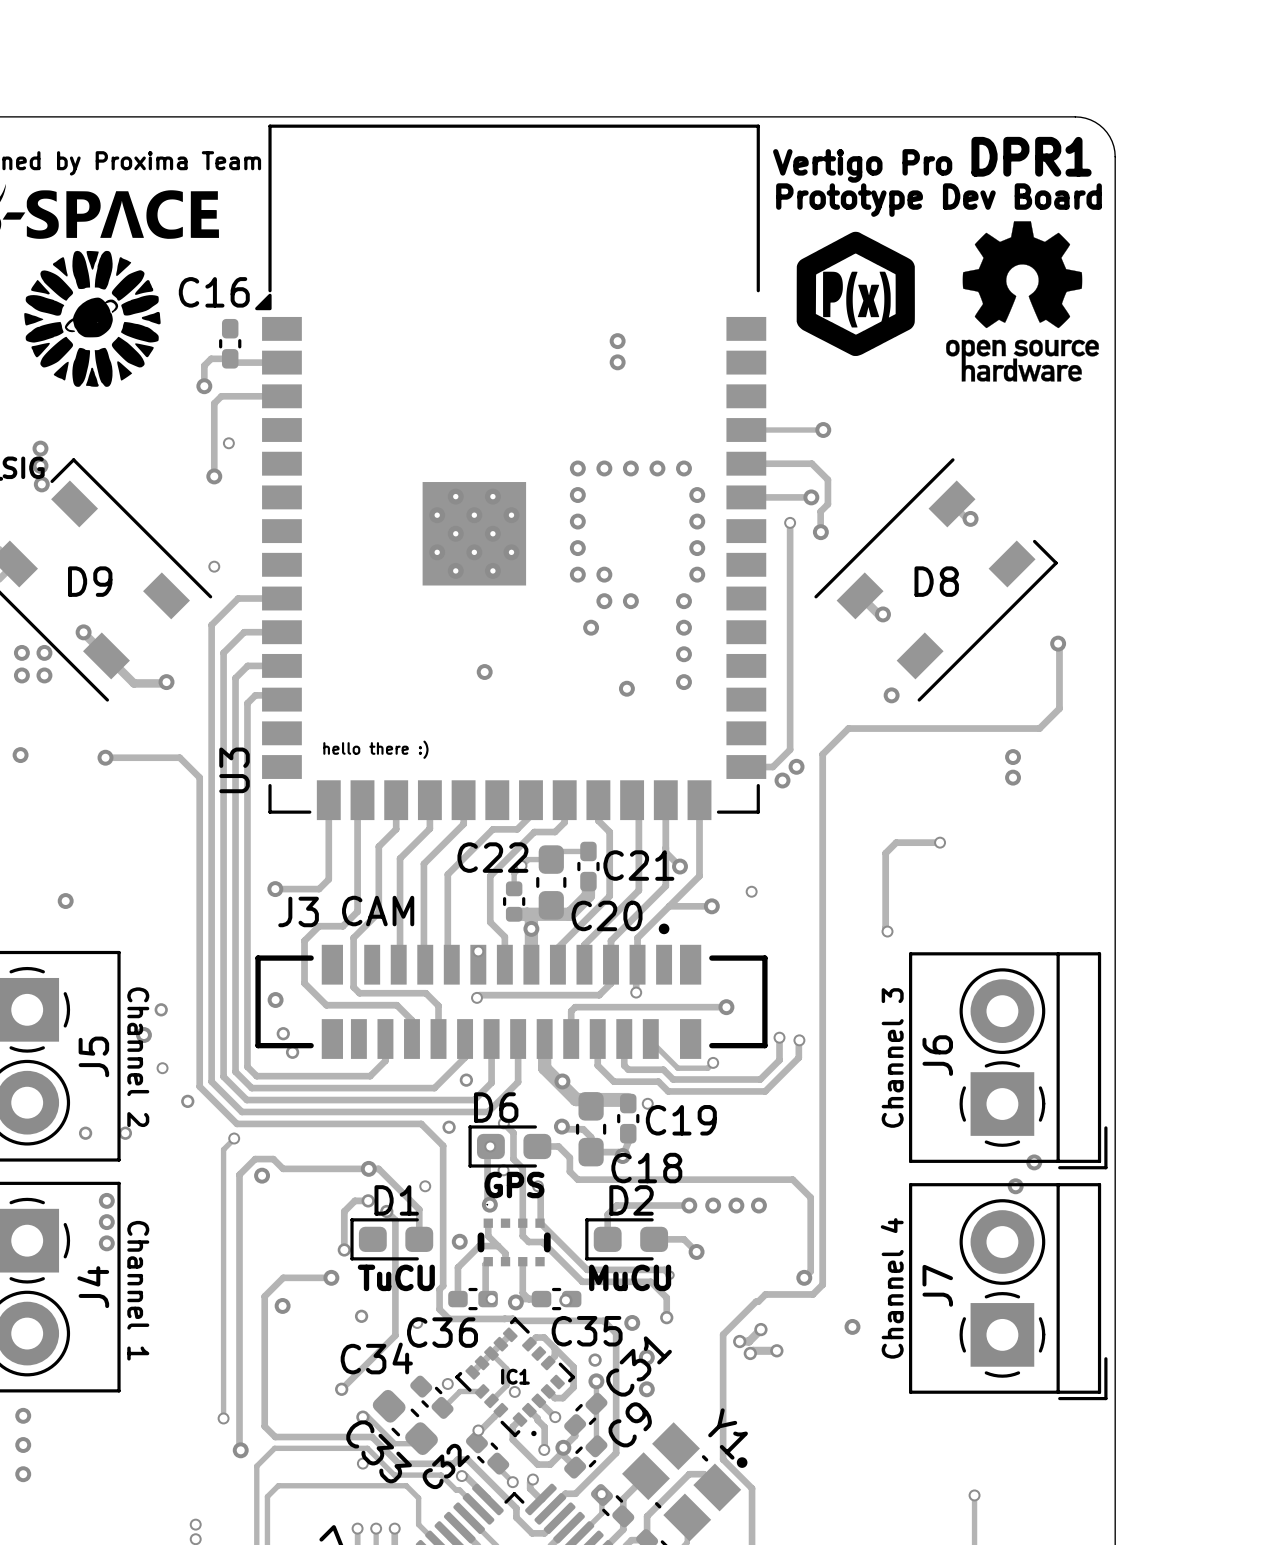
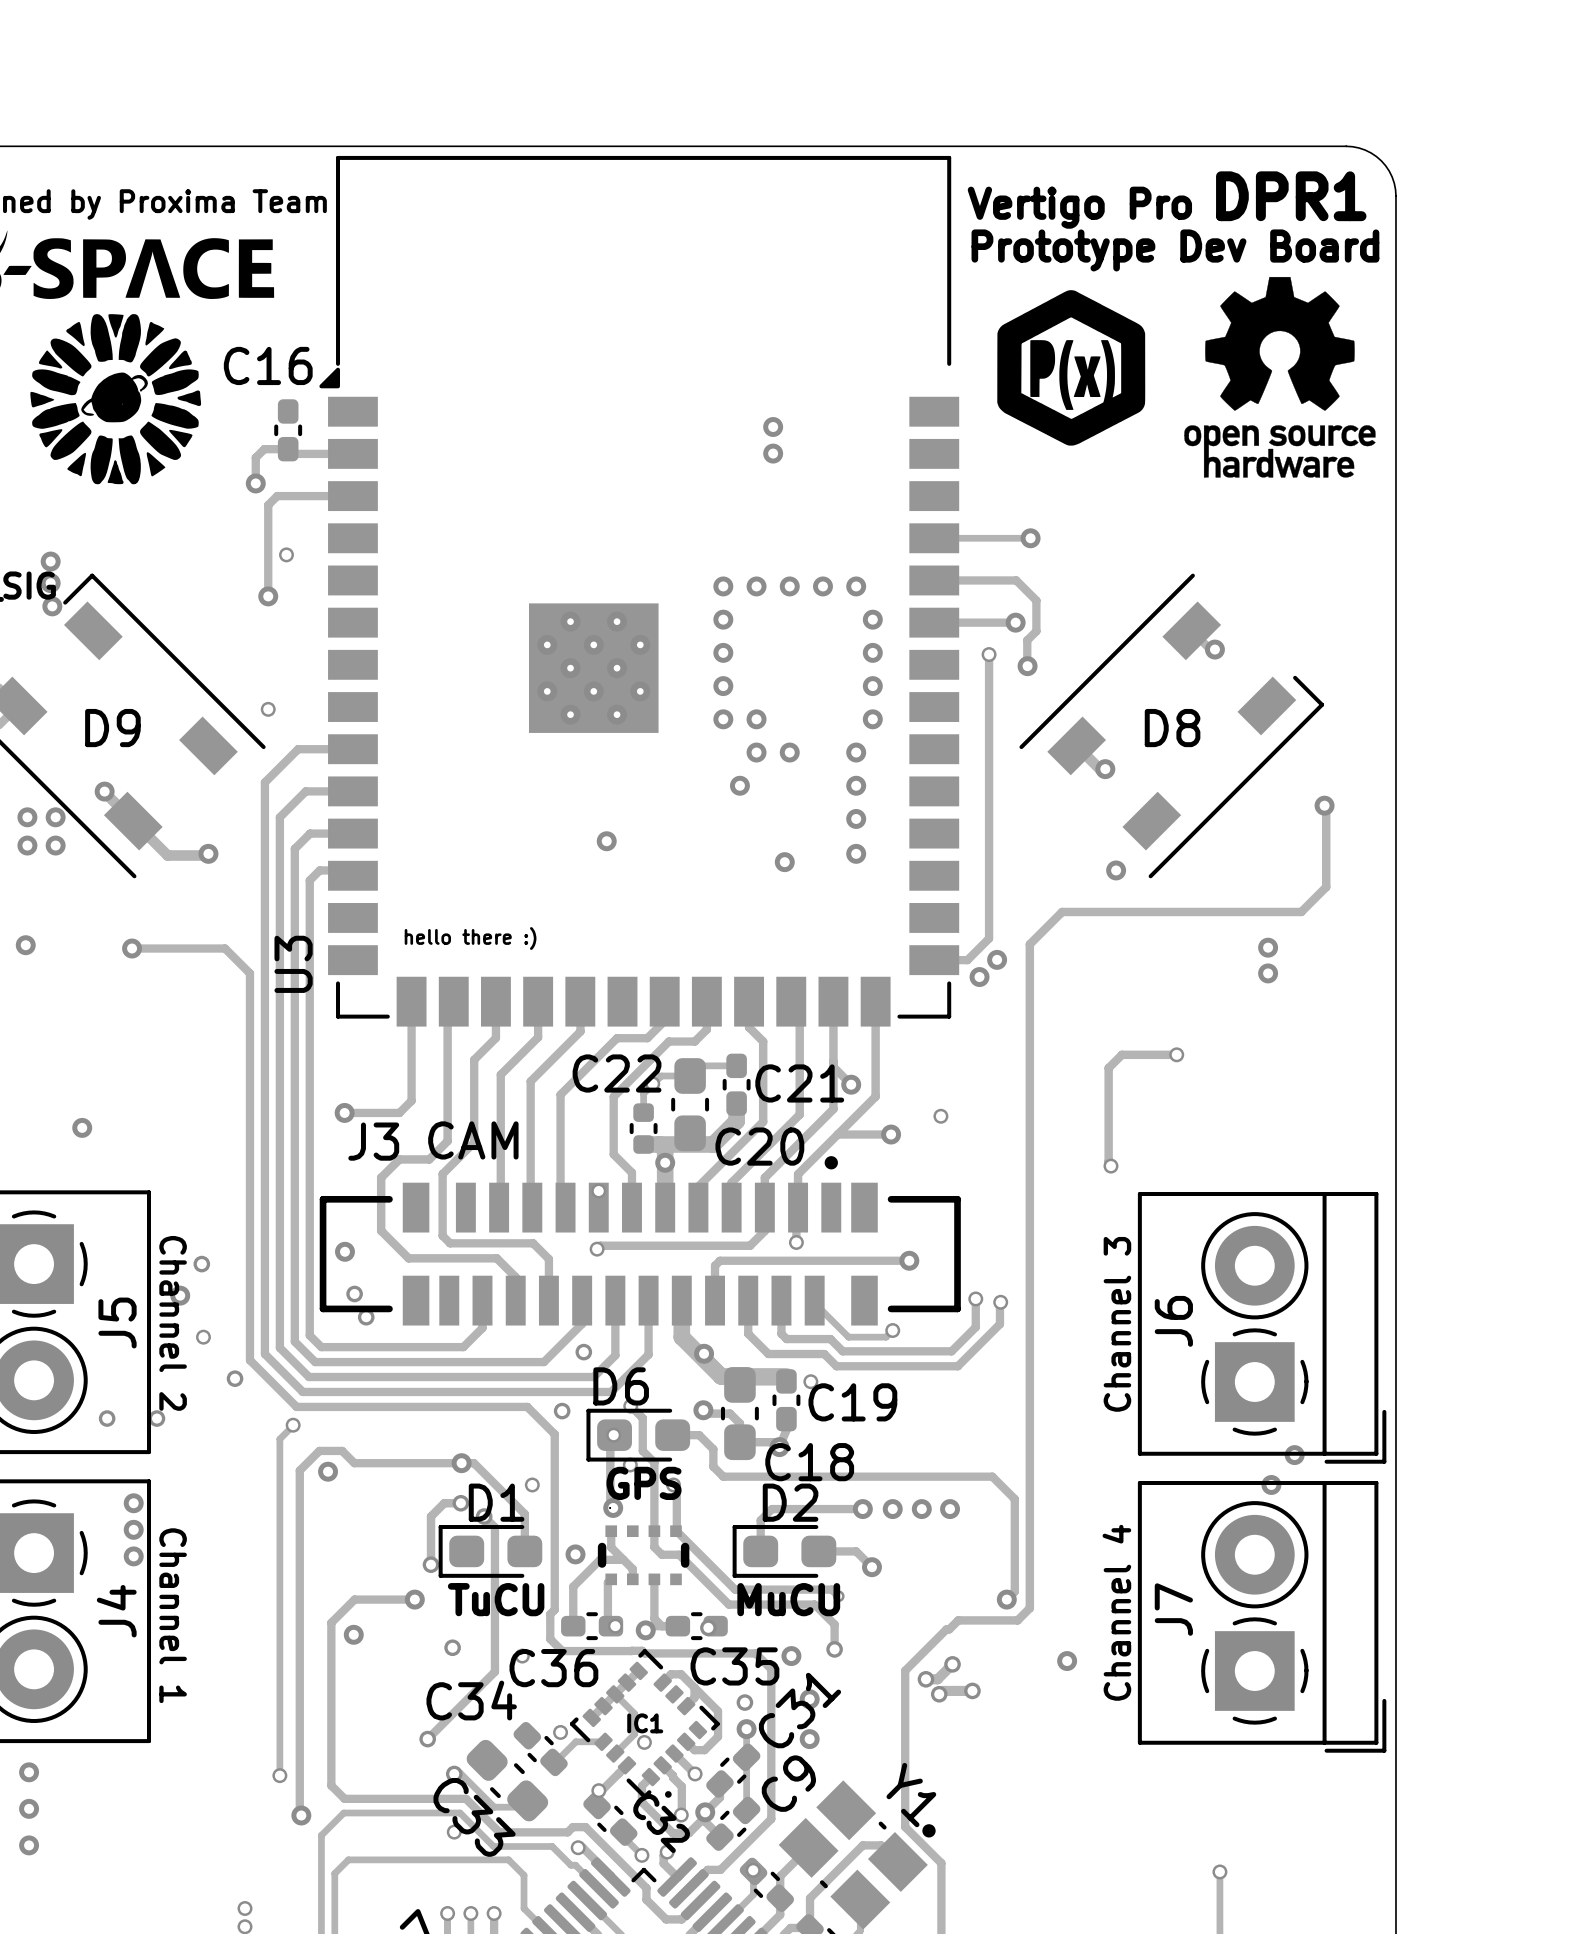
C32 name rotation: 0° (446, 1466) -> 90° clockwise (661, 1823)
C32 name position: C32 (446, 1466) -> C32 (661, 1823)

